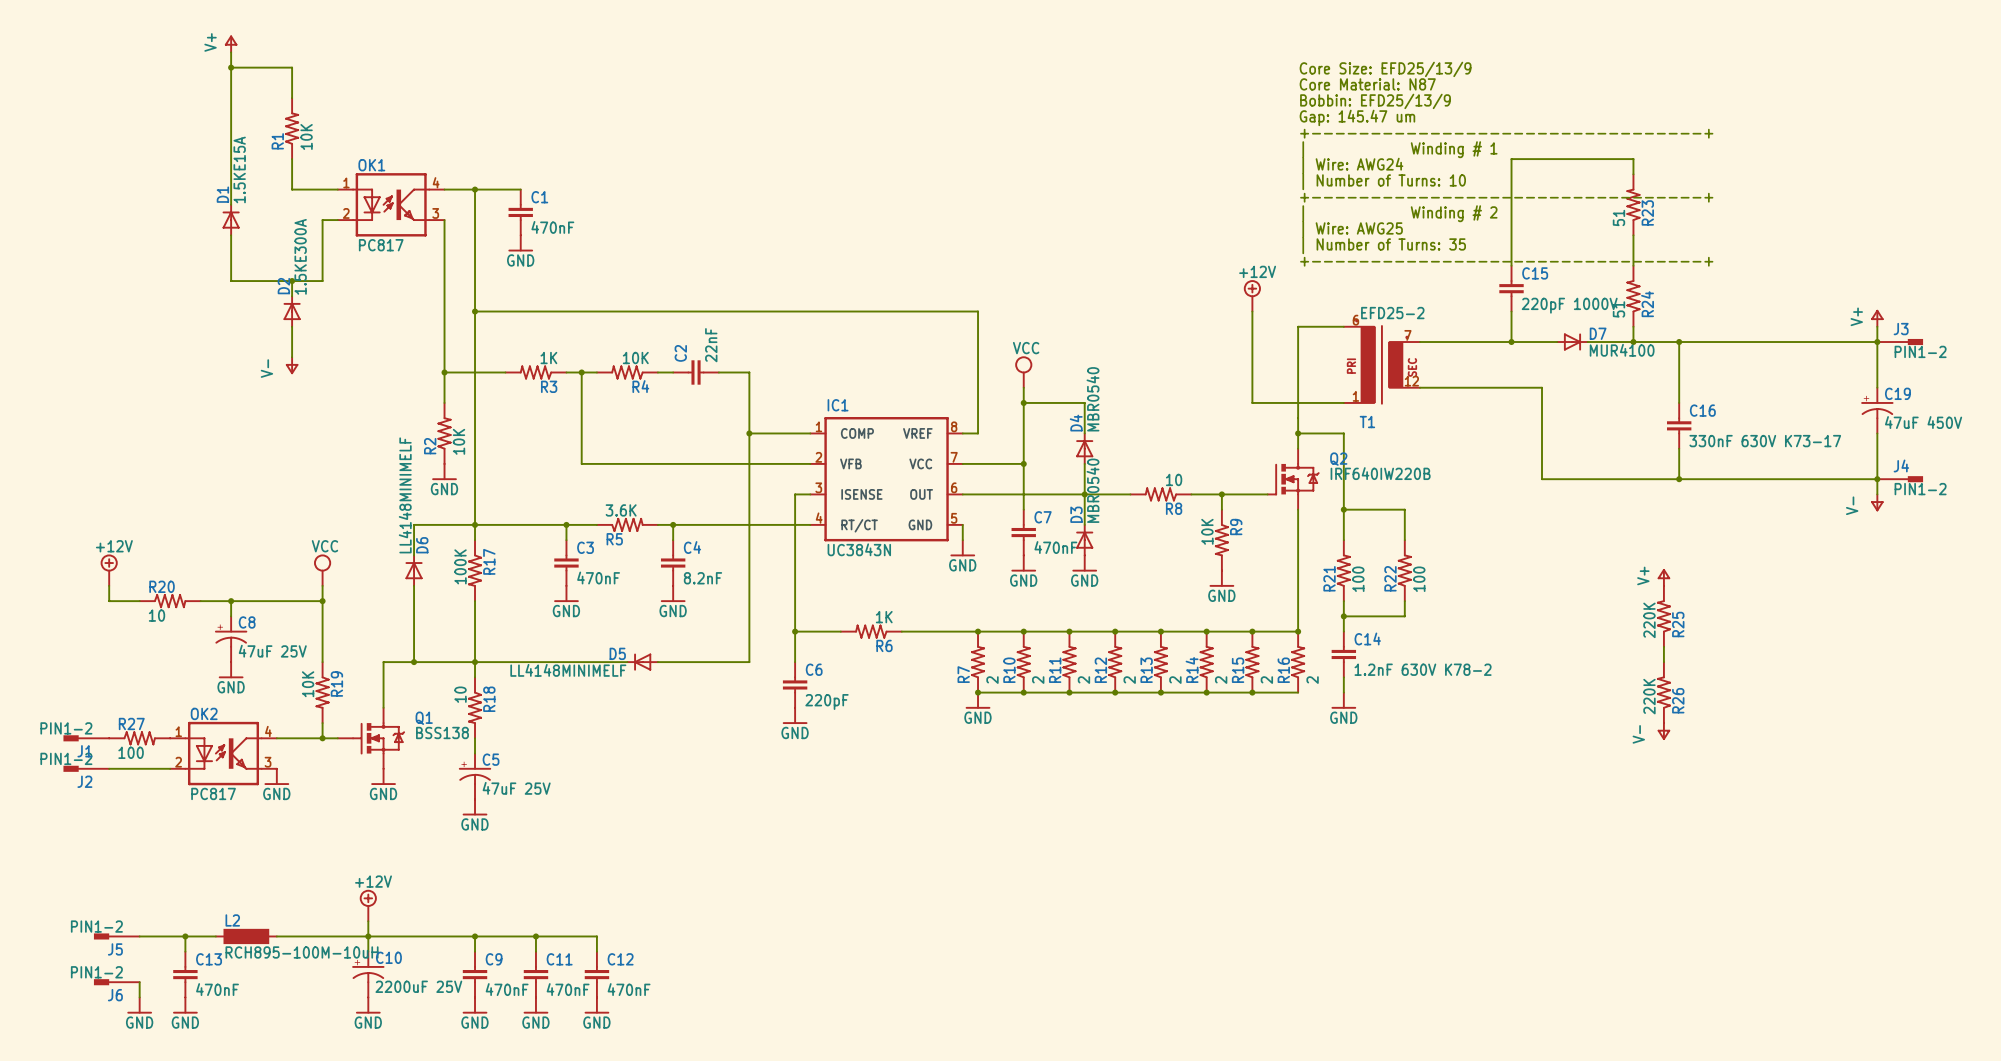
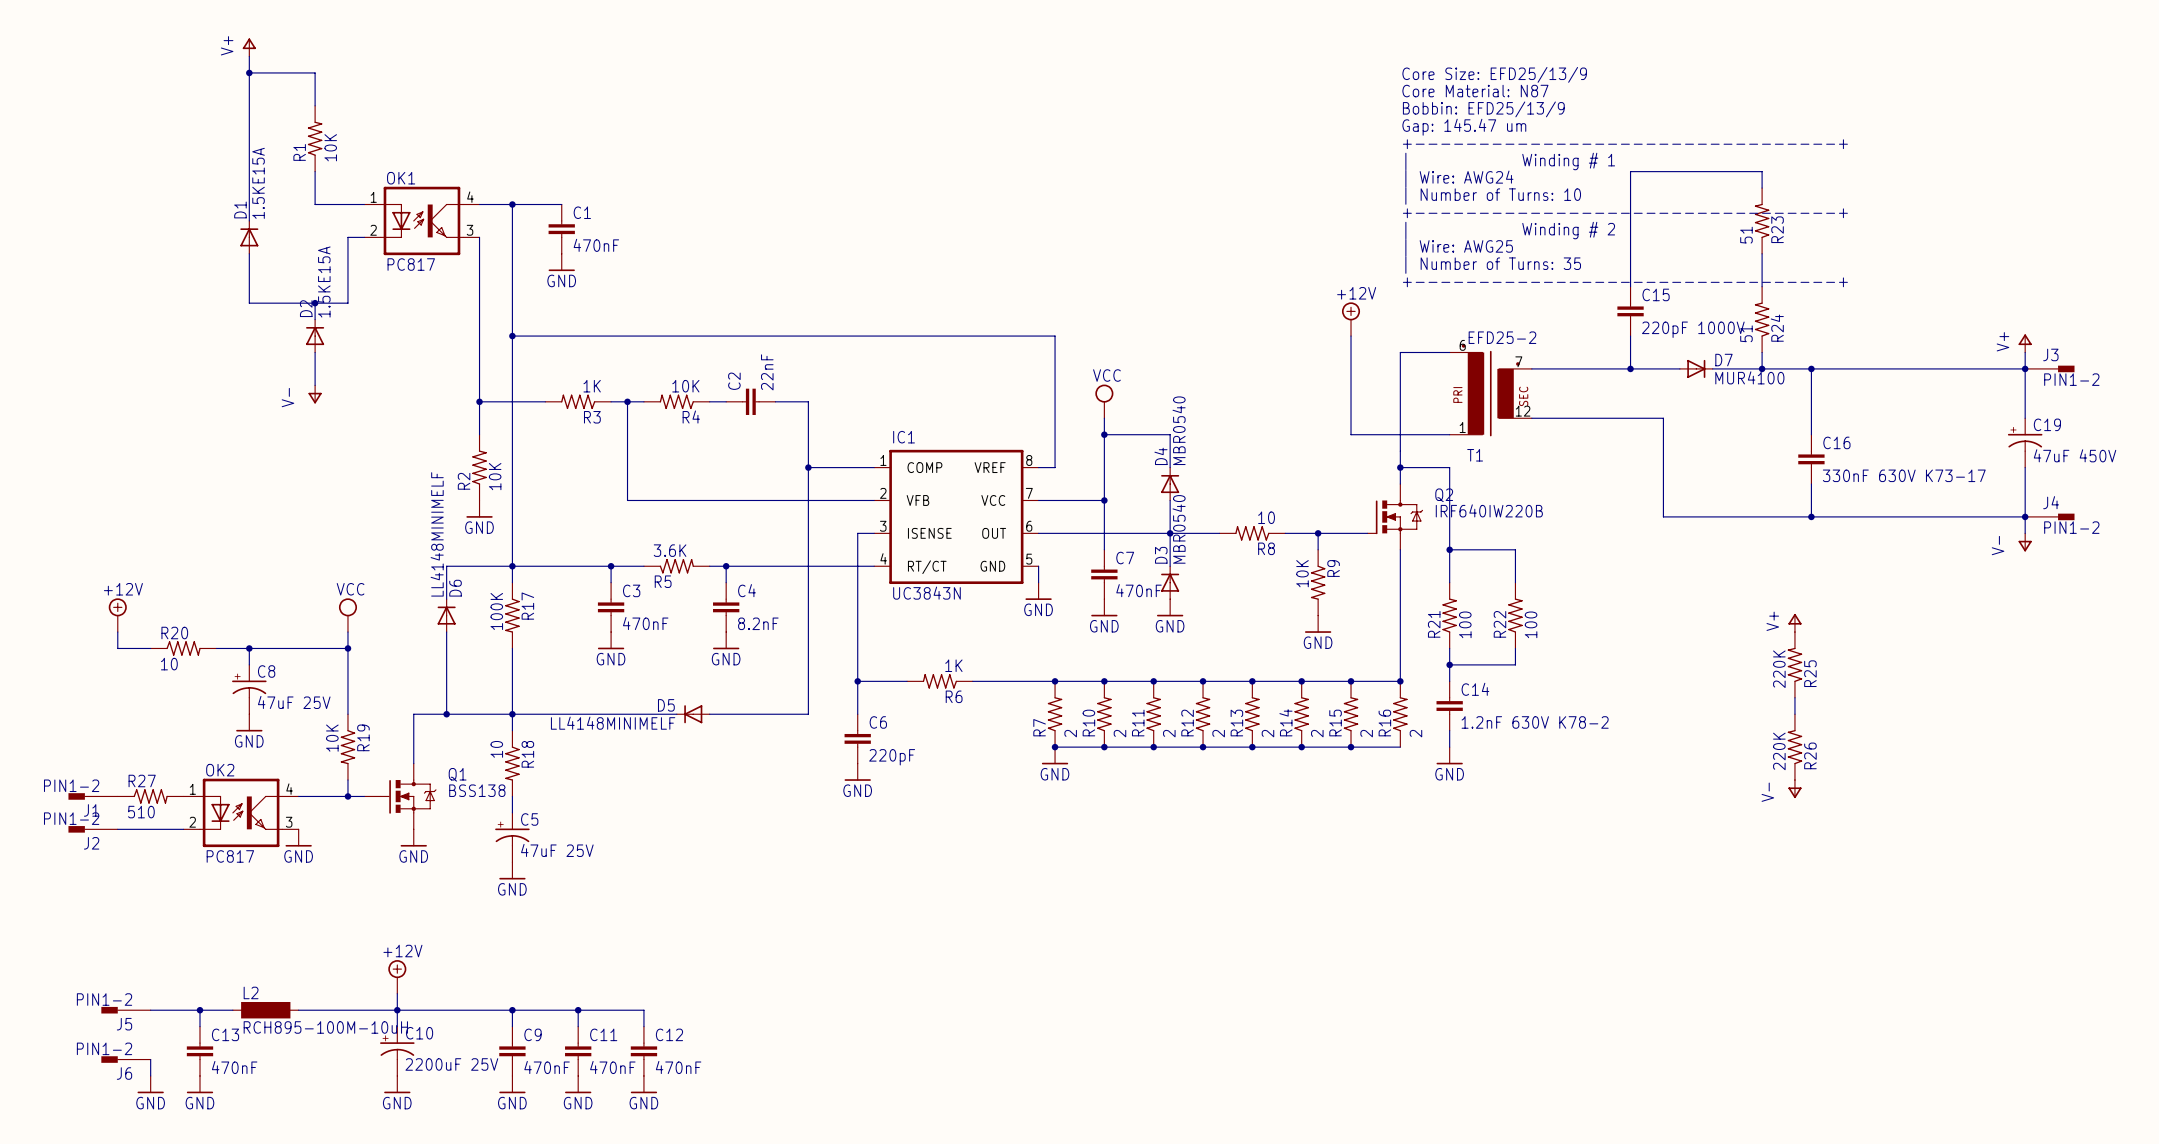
D2 value: 1.5KE300A (300, 256) -> 1.5KE15A (324, 282)
R27 value: 100 (131, 752) -> 510 (141, 812)

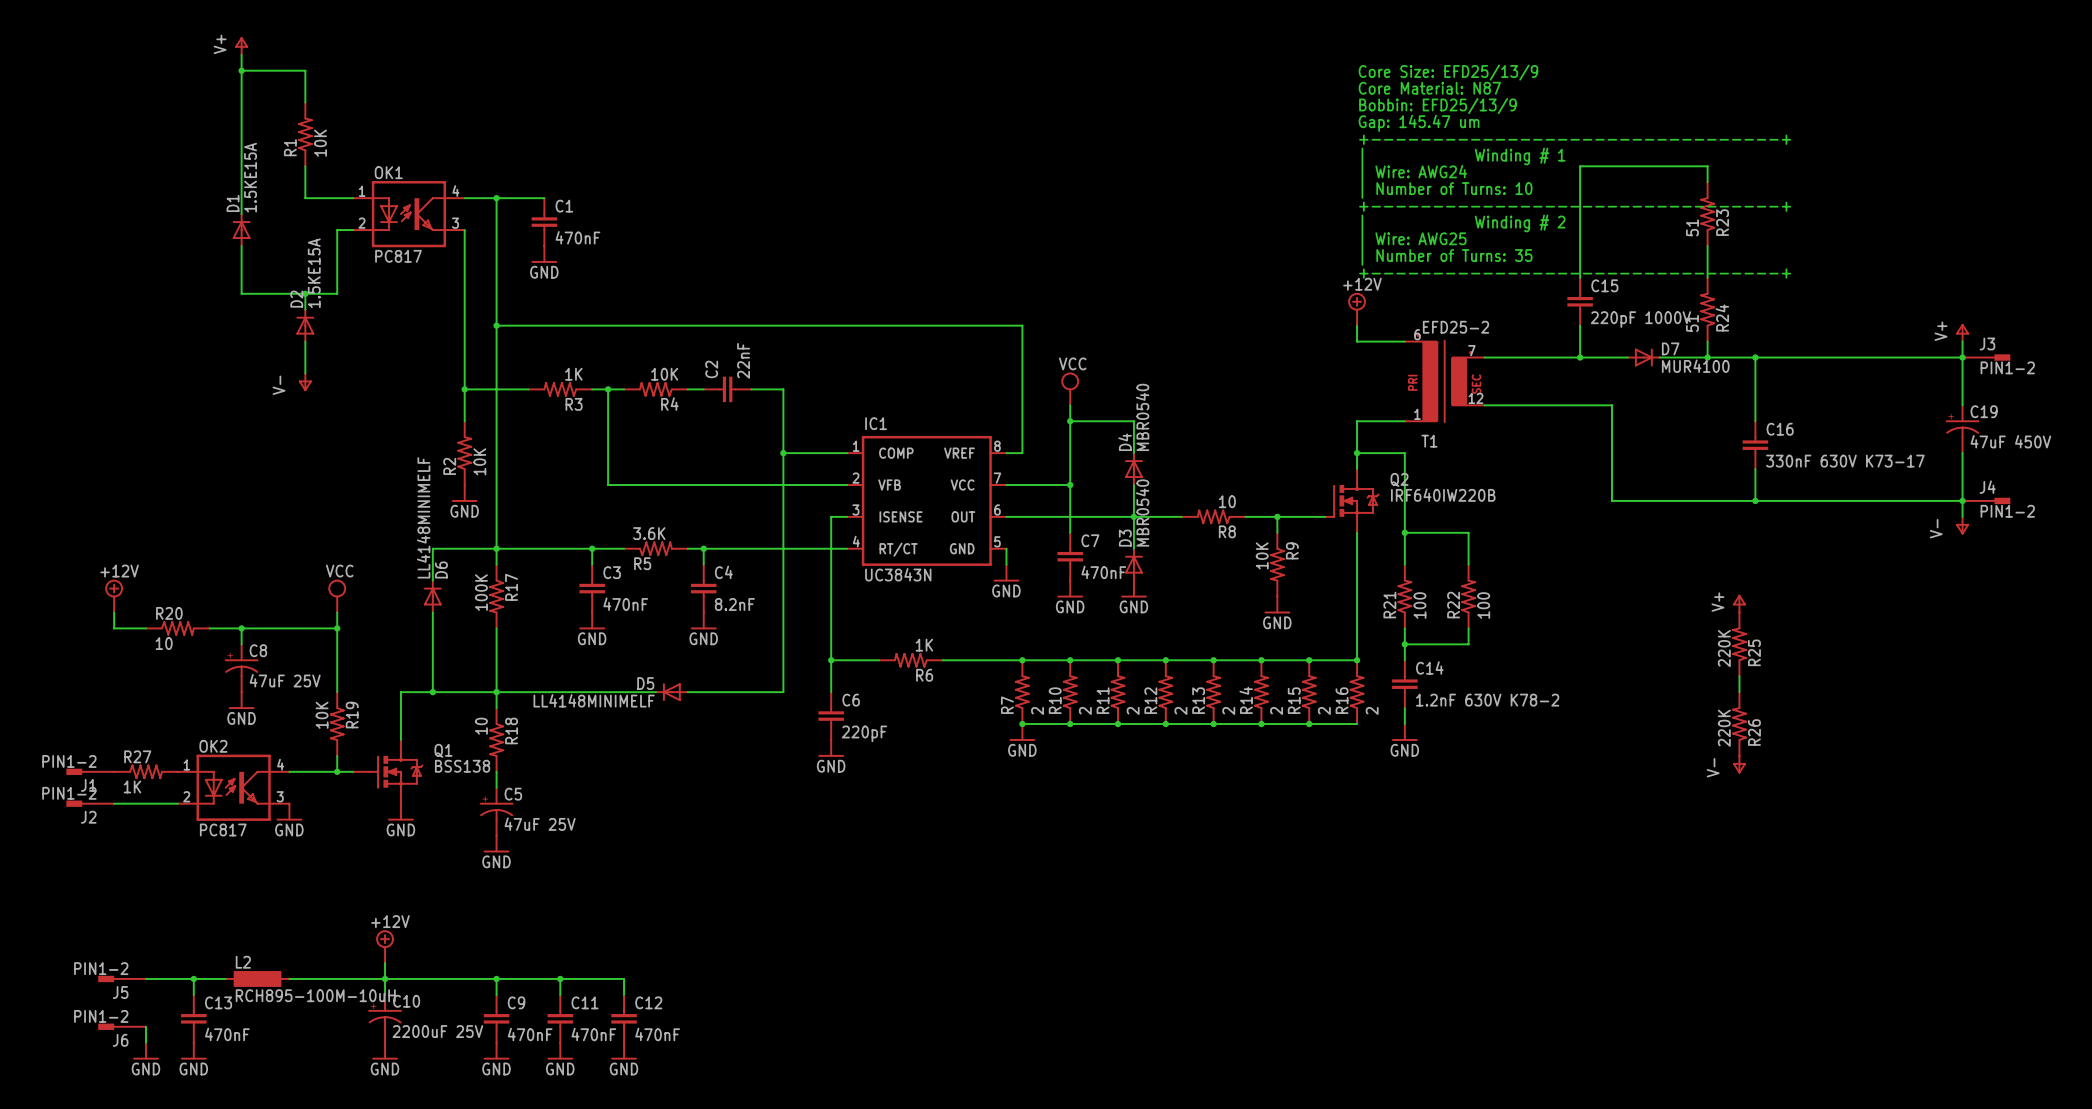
power symbol position: +12V (1351, 319) -> +12V (1357, 309)
wire: (1351, 336) (1351, 434) (1400, 434) (1400, 352) -> (1357, 325) (1357, 341)
R27 value: 510 (141, 812) -> 1K (132, 786)

